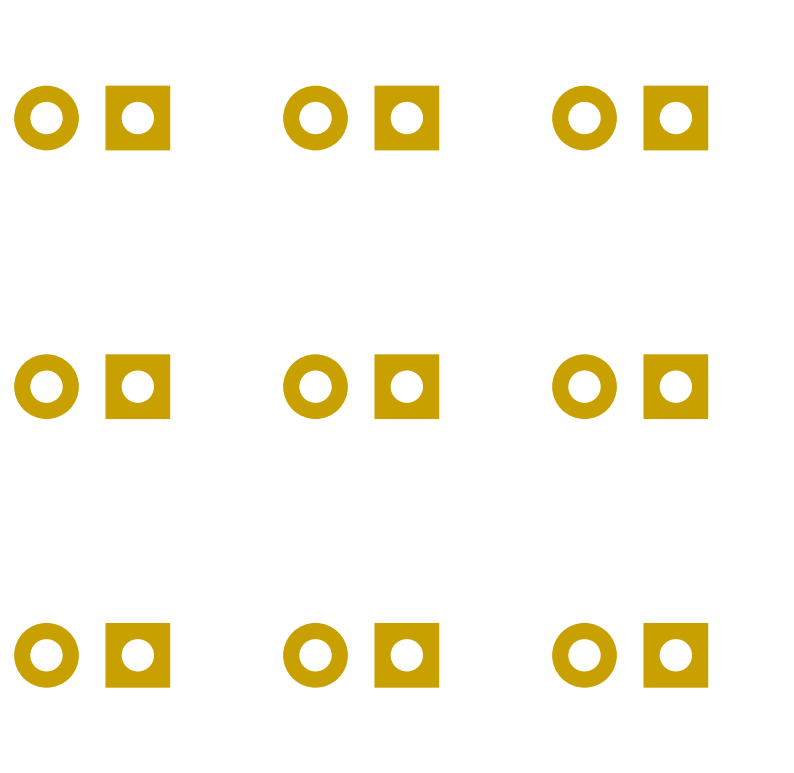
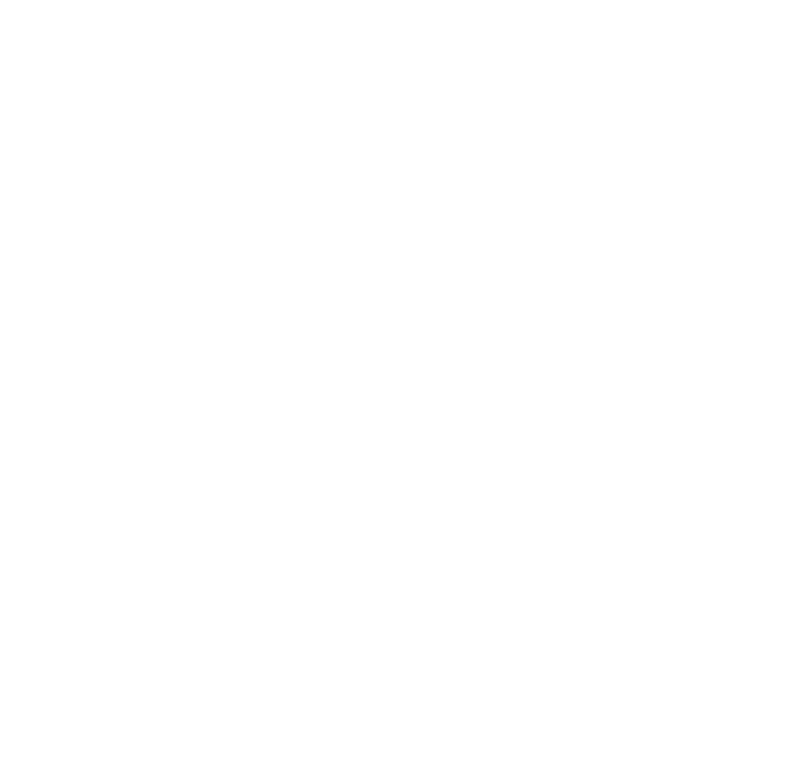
part: (92, 118) -> none
part: (361, 118) -> none
part: (630, 118) -> none
part: (92, 386) -> none
part: (361, 386) -> none
part: (630, 386) -> none
part: (92, 655) -> none
part: (361, 655) -> none
part: (630, 655) -> none

